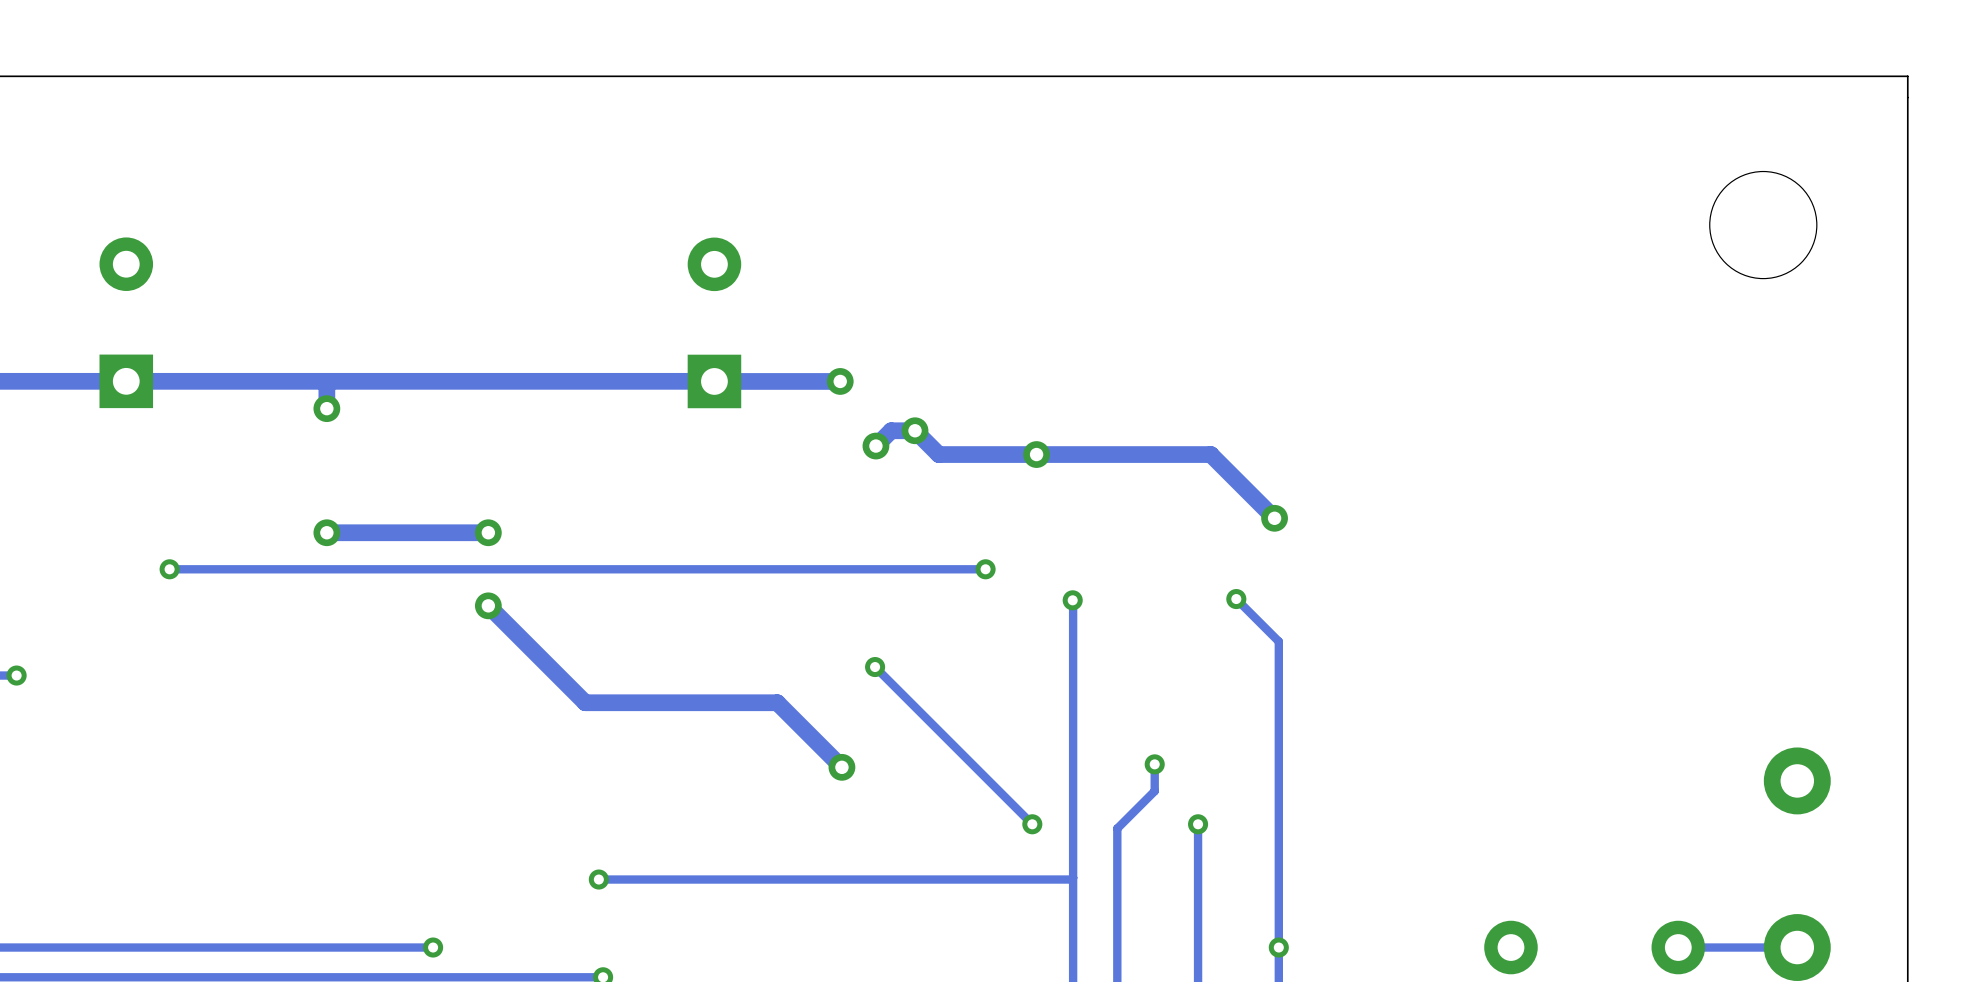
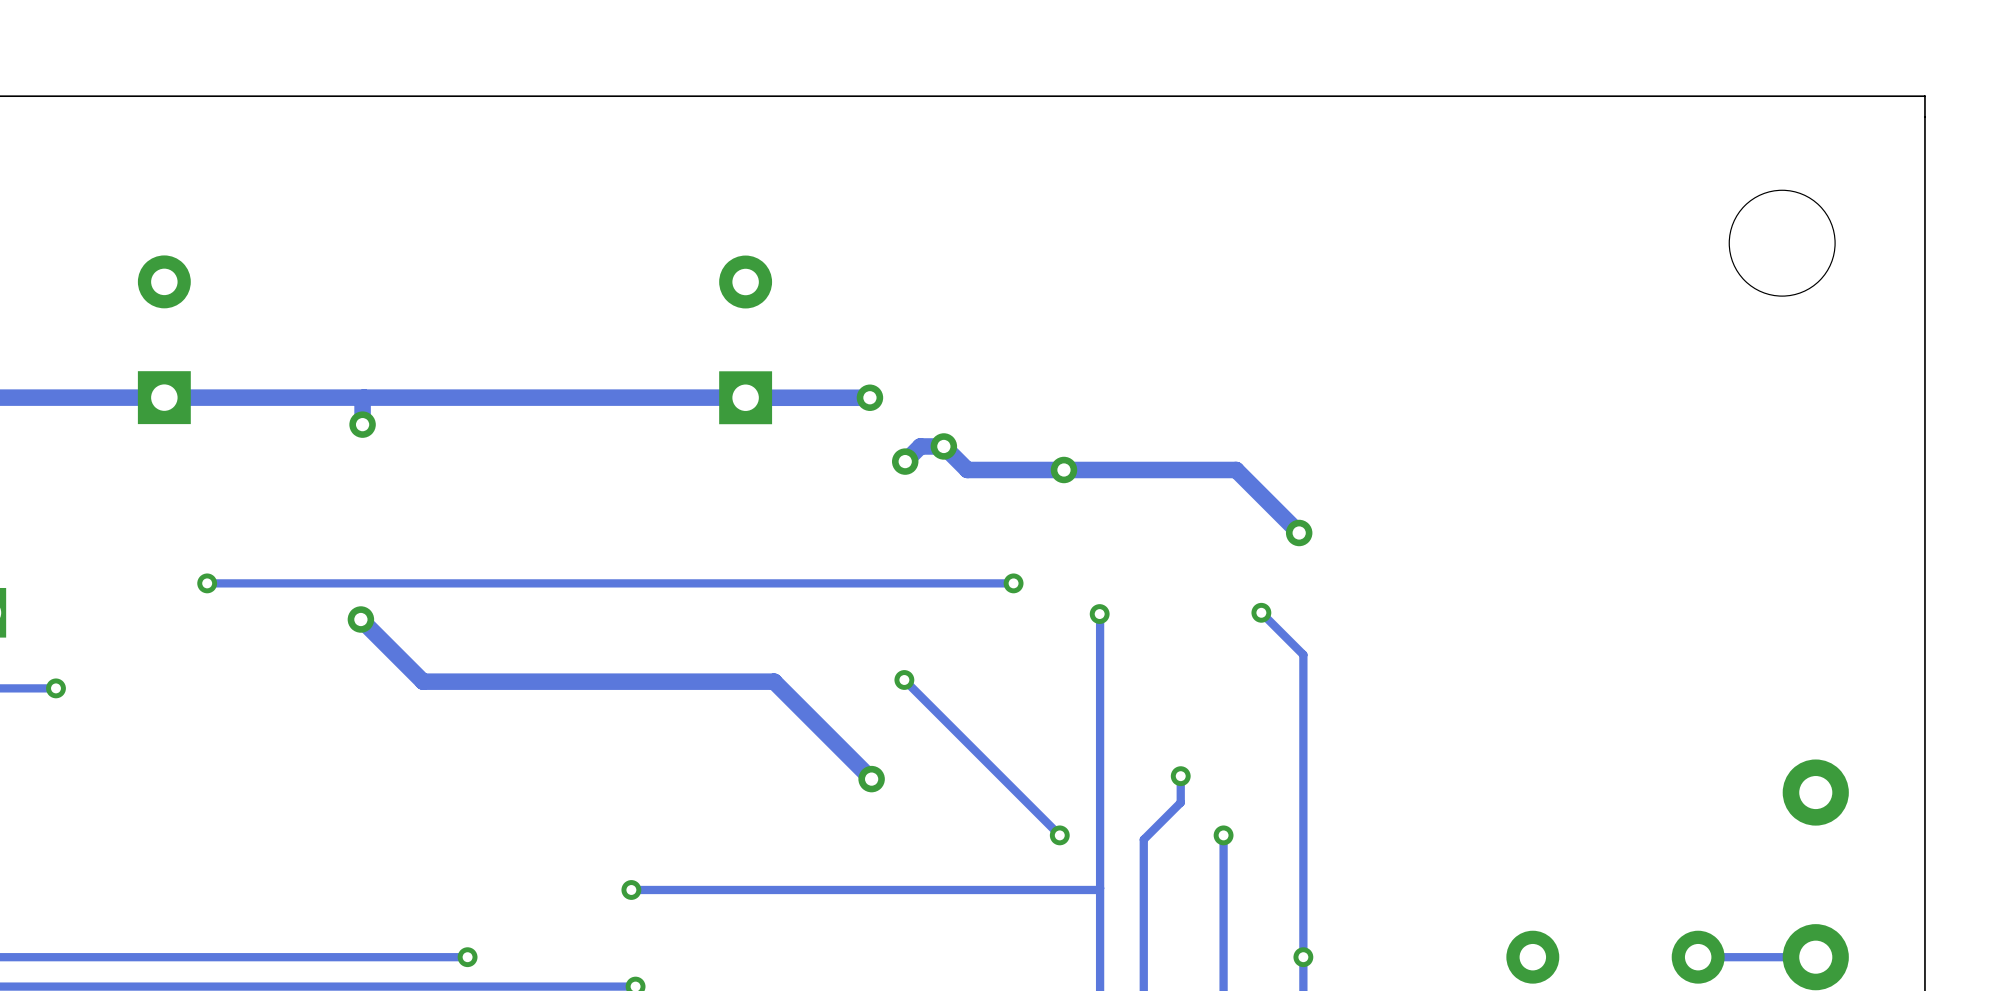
via position: (326, 532) -> (360, 619)
track: (488, 532) (326, 532) -> none
via: (488, 532) -> none
track: (488, 605) (585, 702) (777, 702) -> (360, 619) (423, 681) (774, 681) (807, 715)
via: (488, 605) -> none

